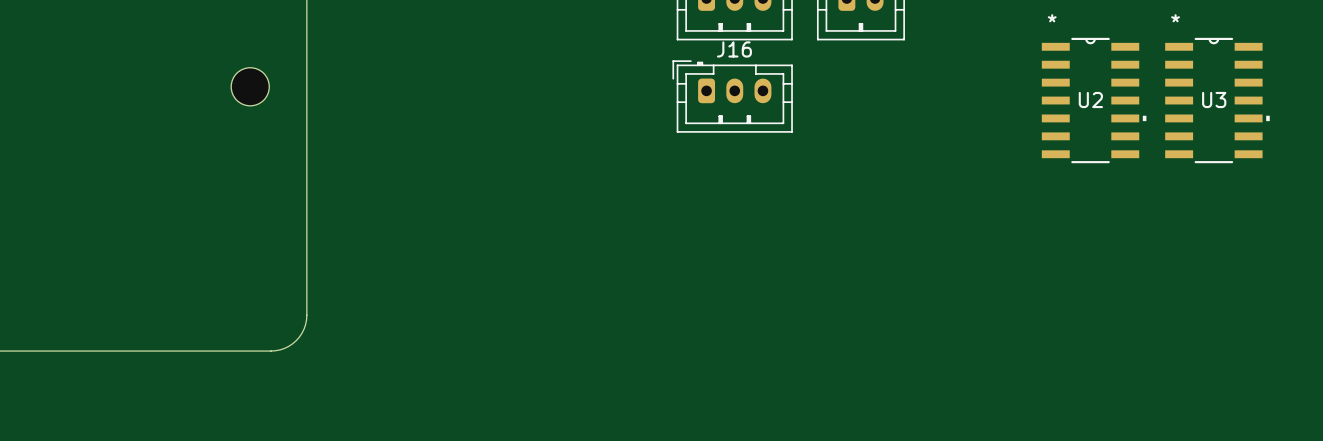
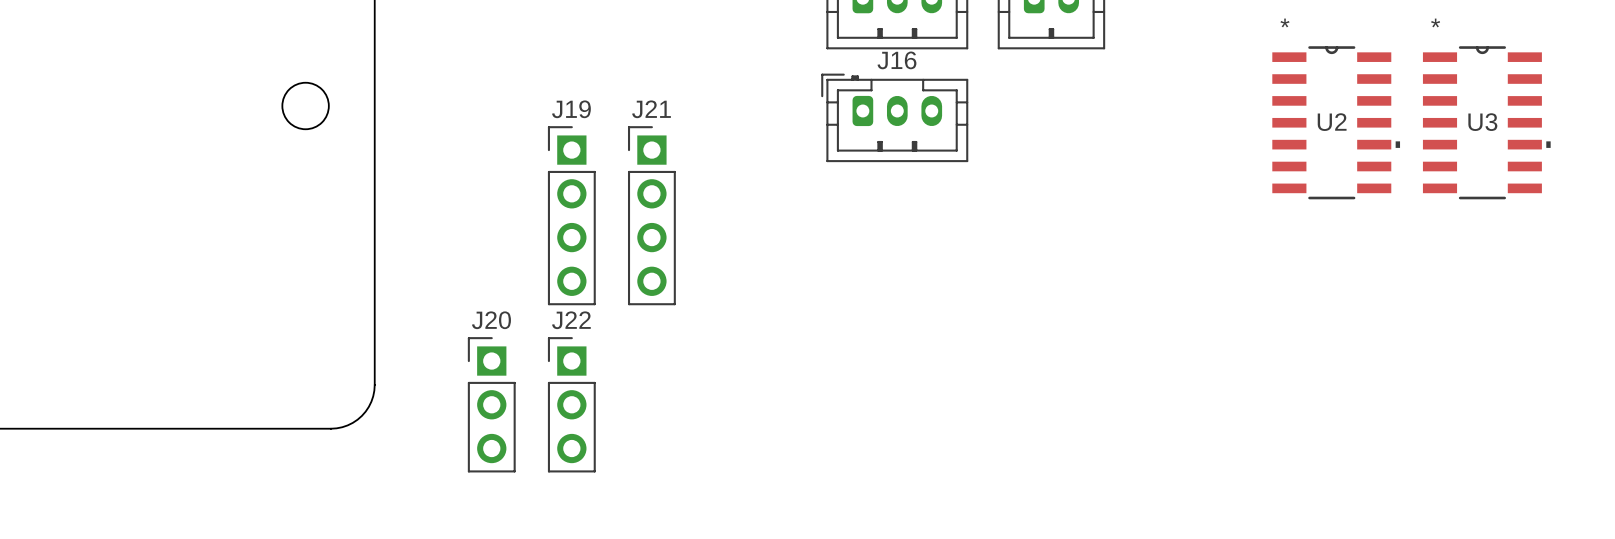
J19: none -> (571, 215)
J21: none -> (651, 215)
J20: none -> (491, 404)
J22: none -> (571, 404)

